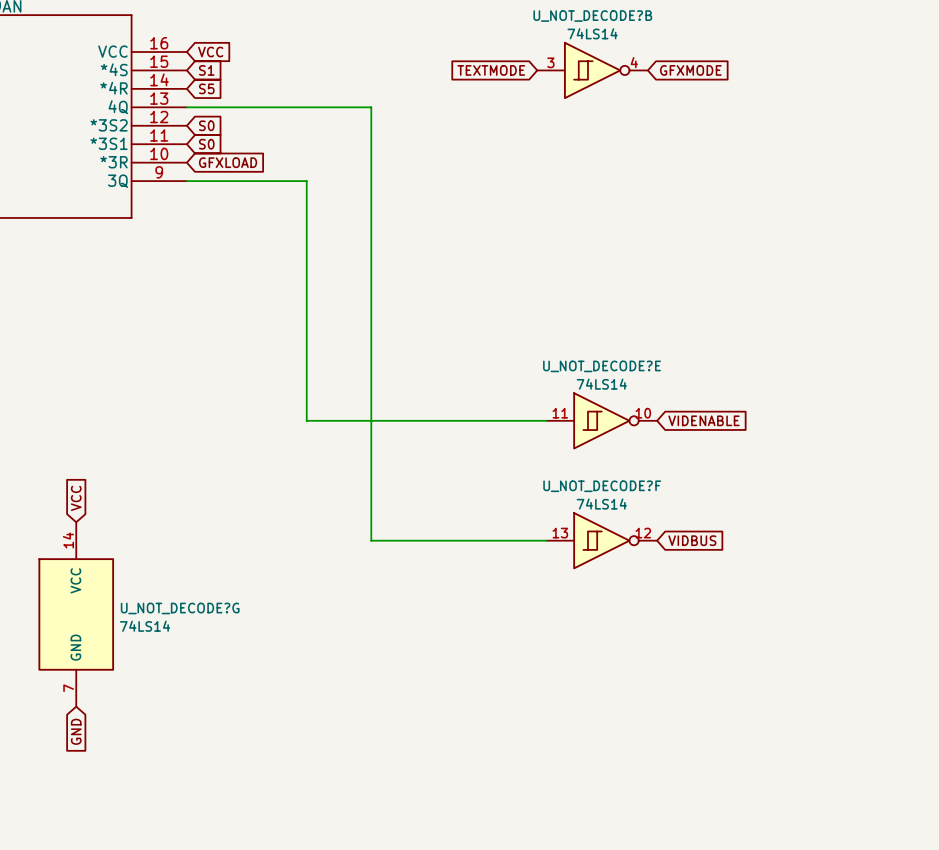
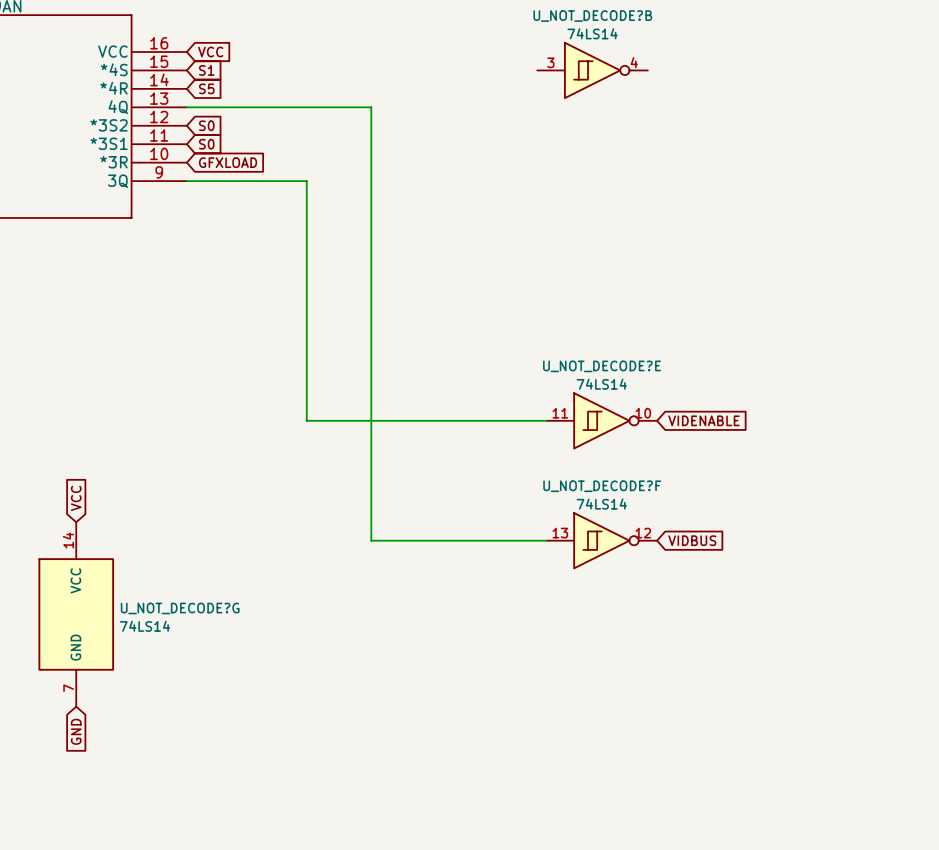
global label: TEXTMODE (491, 70) -> none
global label: GFXMODE (690, 70) -> none

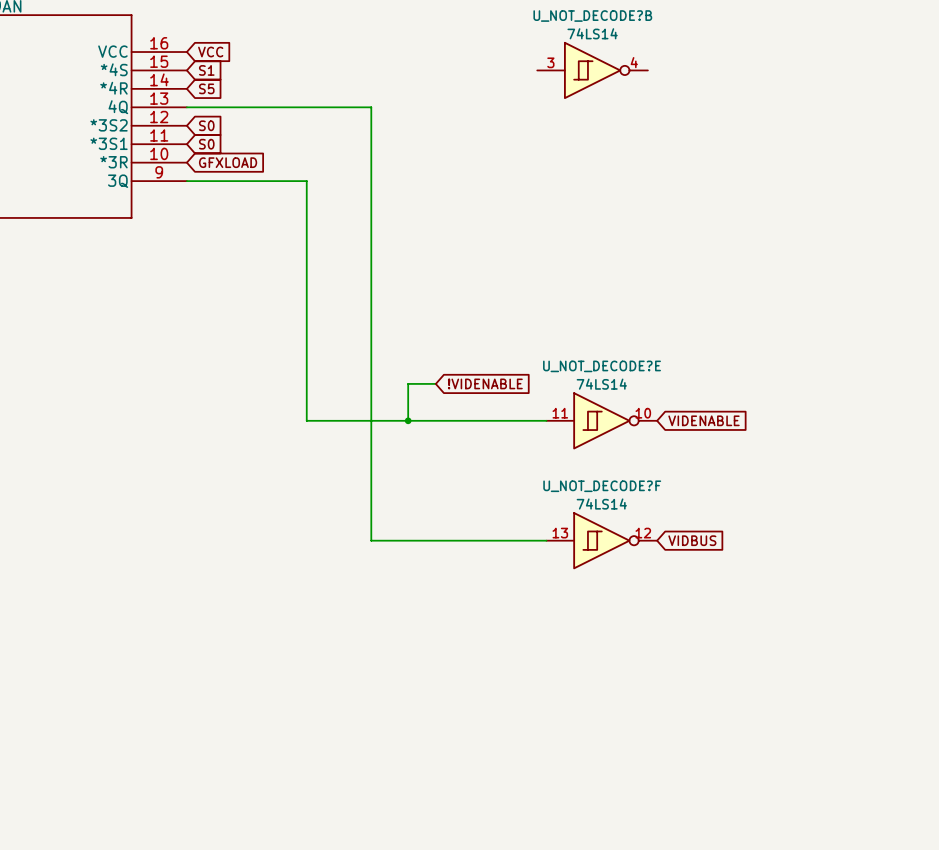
wire: none -> (435, 383) (408, 383) (408, 420)
global label: none -> !VIDENABLE (485, 383)
junction: none -> (408, 420)
global label: VCC (76, 498) -> none
U_NOT_DECODE?G: 74LS14 (76, 614) -> none
global label: GND (76, 731) -> none

